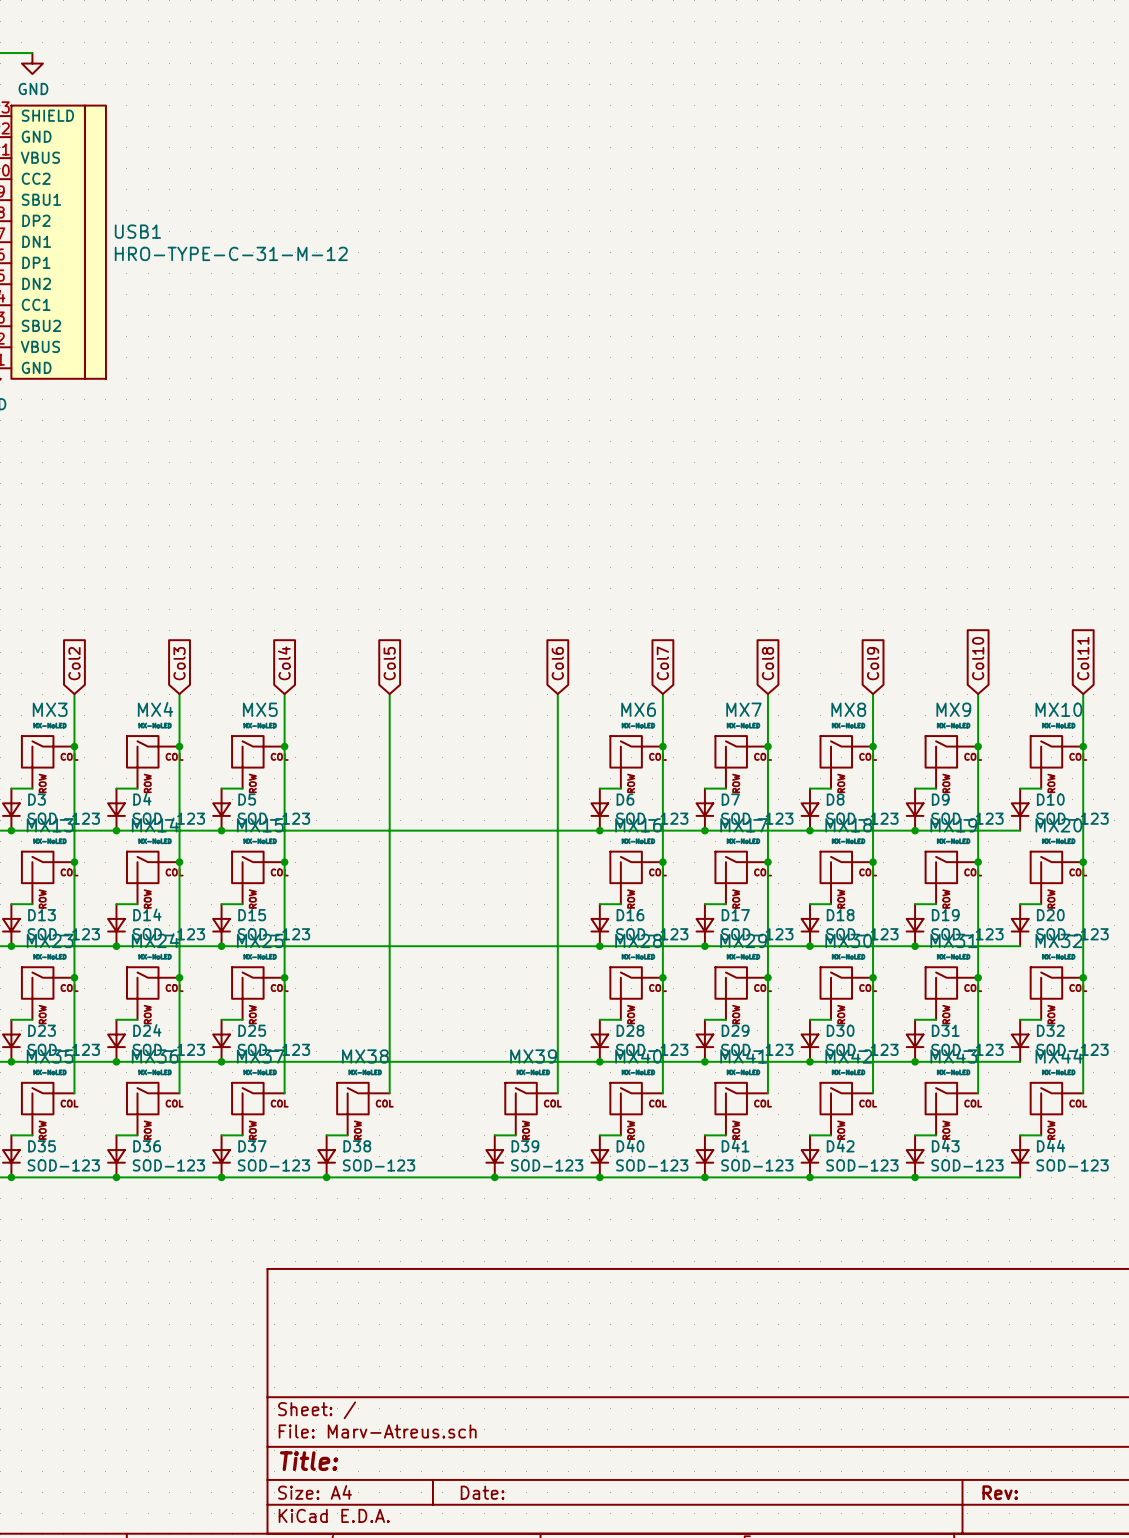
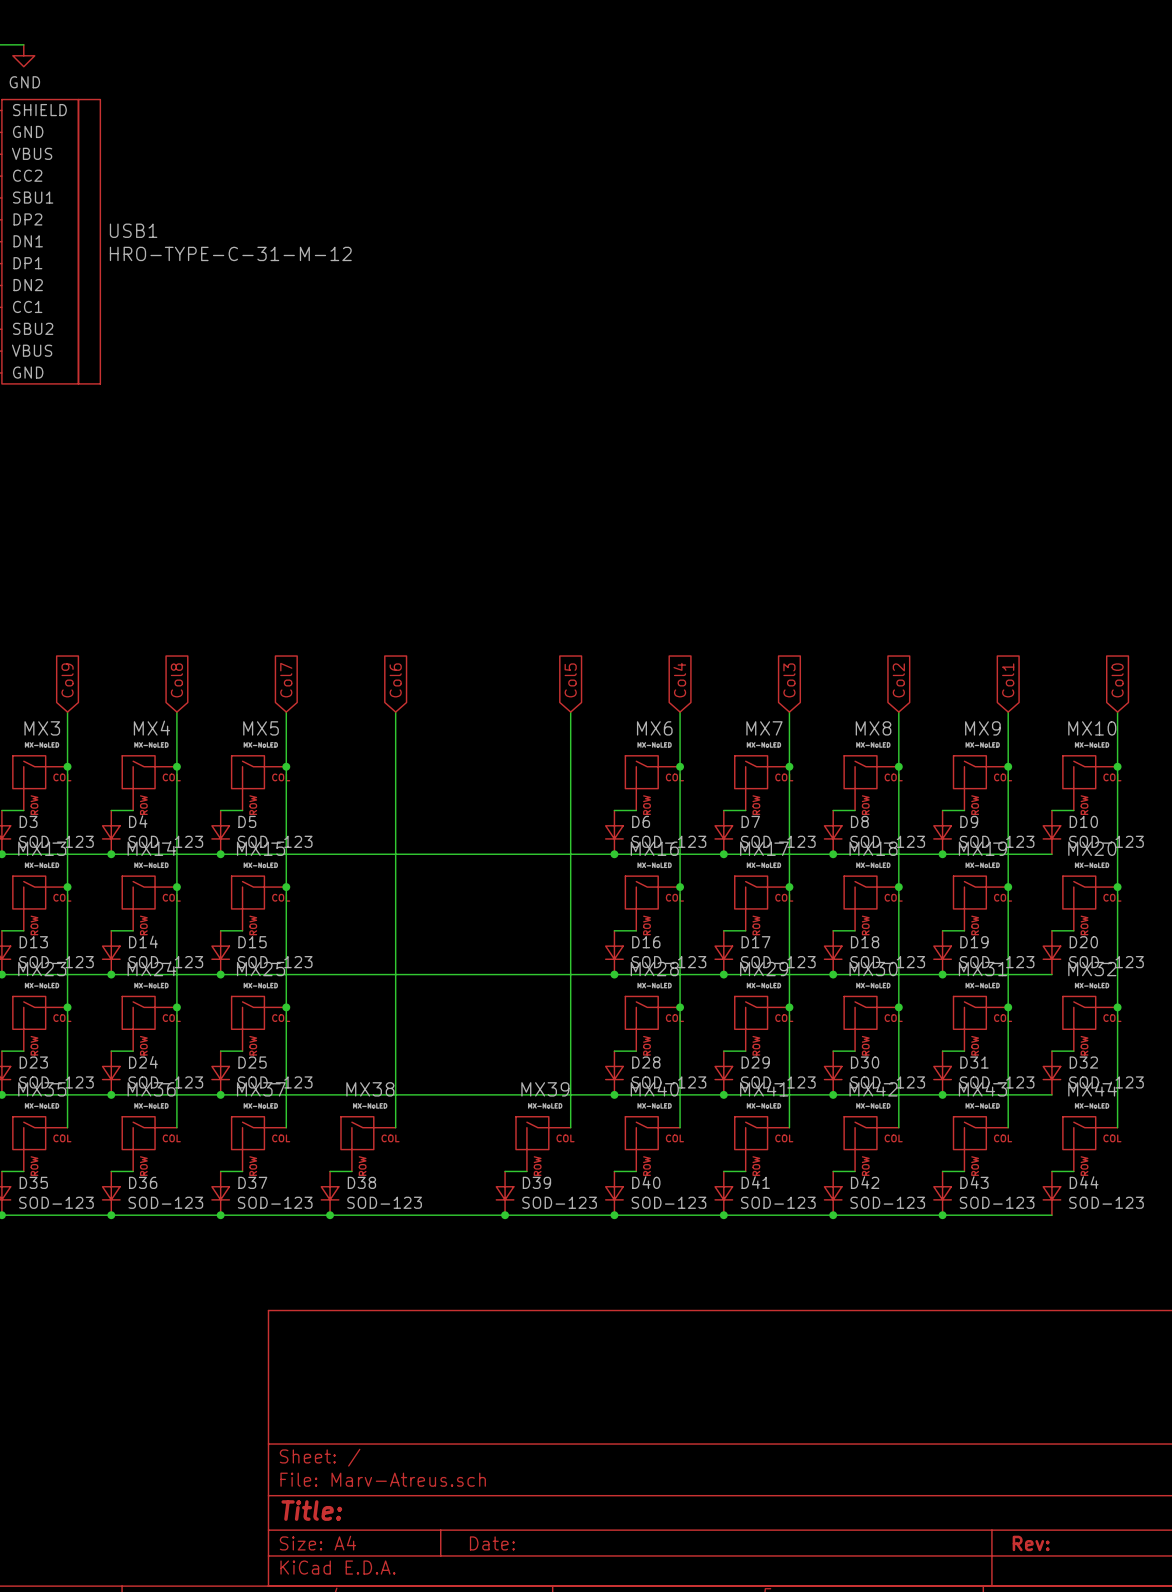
global label: Col10 (978, 658) -> Col1 (1008, 680)
global label: Col11 (1083, 658) -> Col0 (1117, 680)
global label: Col2 (74, 663) -> Col9 (67, 680)
global label: Col3 (179, 663) -> Col8 (176, 680)
global label: Col4 (284, 663) -> Col7 (286, 680)
global label: Col5 (389, 663) -> Col6 (395, 680)
global label: Col6 (557, 663) -> Col5 (570, 680)
global label: Col7 (662, 663) -> Col4 (679, 680)
global label: Col8 (767, 663) -> Col3 (789, 680)
global label: Col9 (873, 663) -> Col2 (898, 680)

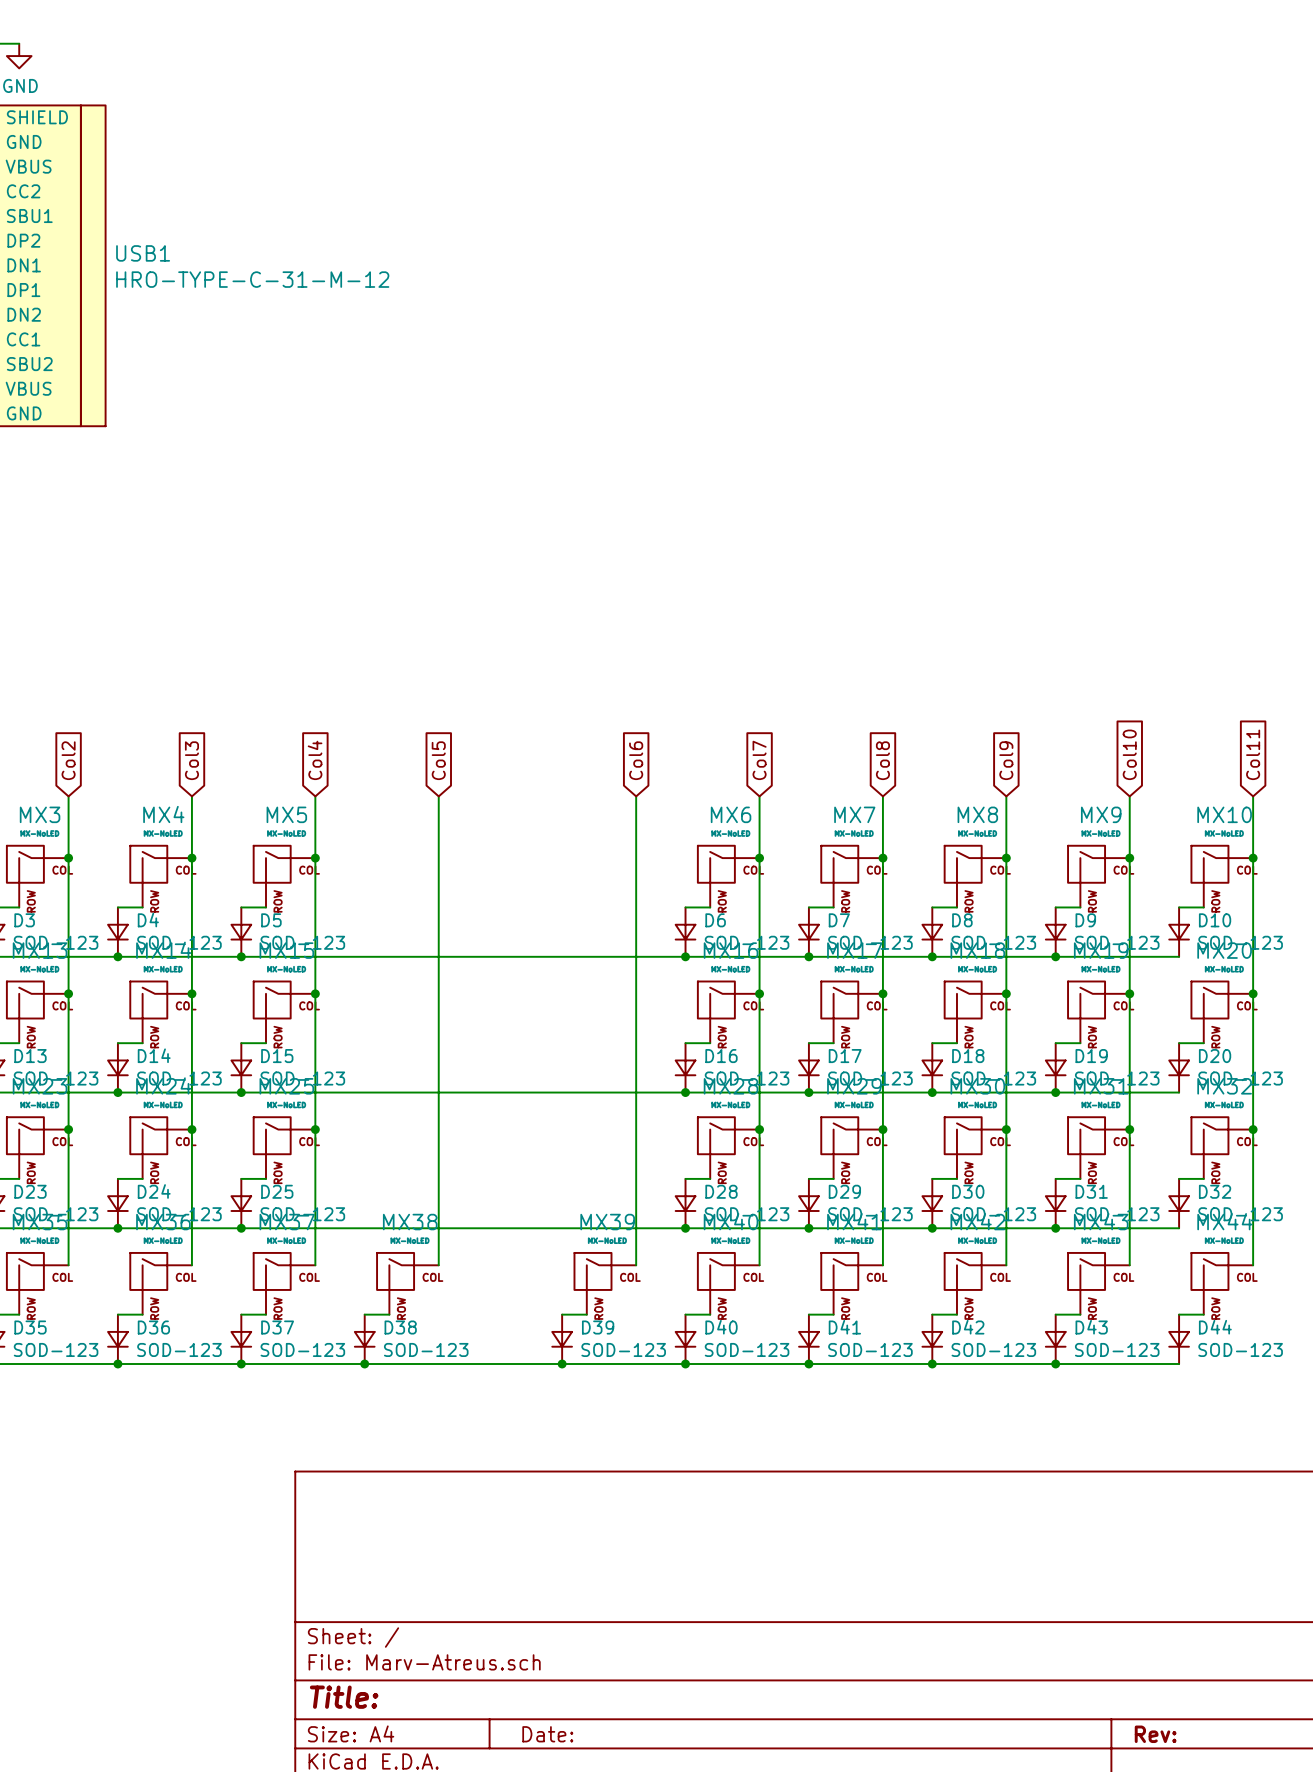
global label: Col9 (67, 680) -> Col2 (68, 760)
global label: Col8 (176, 680) -> Col3 (191, 760)
global label: Col7 (286, 680) -> Col4 (315, 760)
global label: Col6 (395, 680) -> Col5 (438, 760)
global label: Col5 (570, 680) -> Col6 (636, 760)
global label: Col4 (679, 680) -> Col7 (759, 760)
global label: Col3 (789, 680) -> Col8 (882, 760)
global label: Col2 (898, 680) -> Col9 (1006, 760)
global label: Col1 (1008, 680) -> Col10 (1129, 754)
global label: Col0 (1117, 680) -> Col11 (1253, 754)

